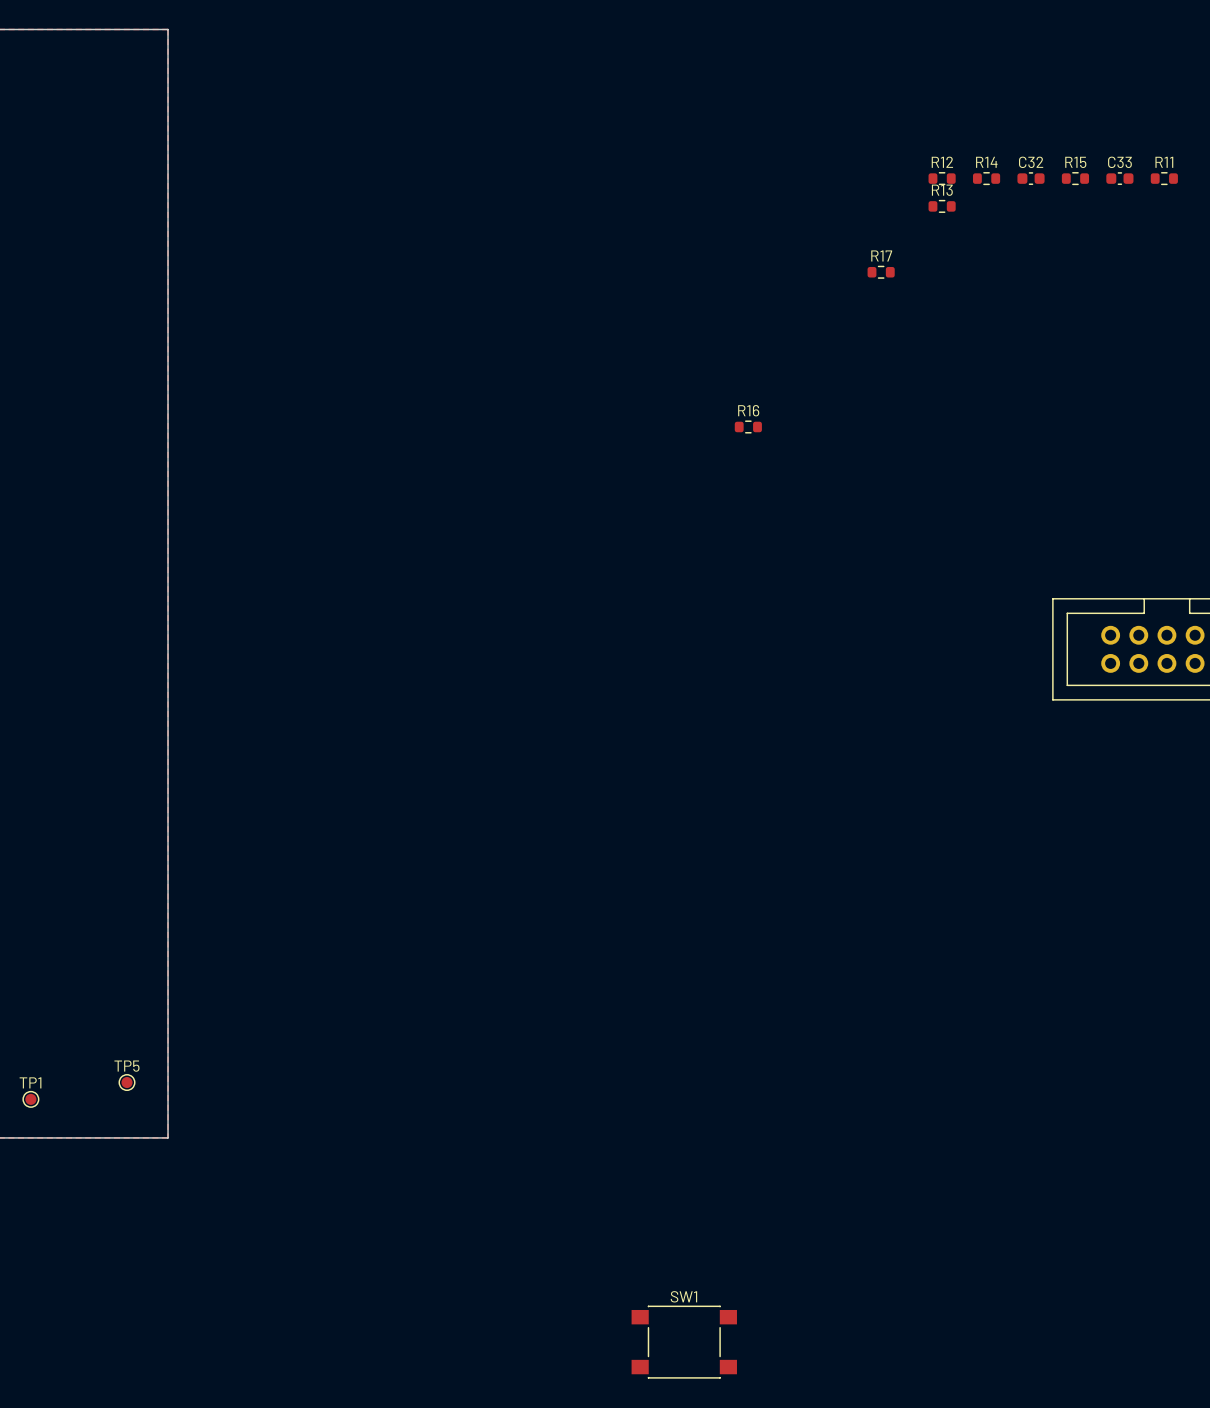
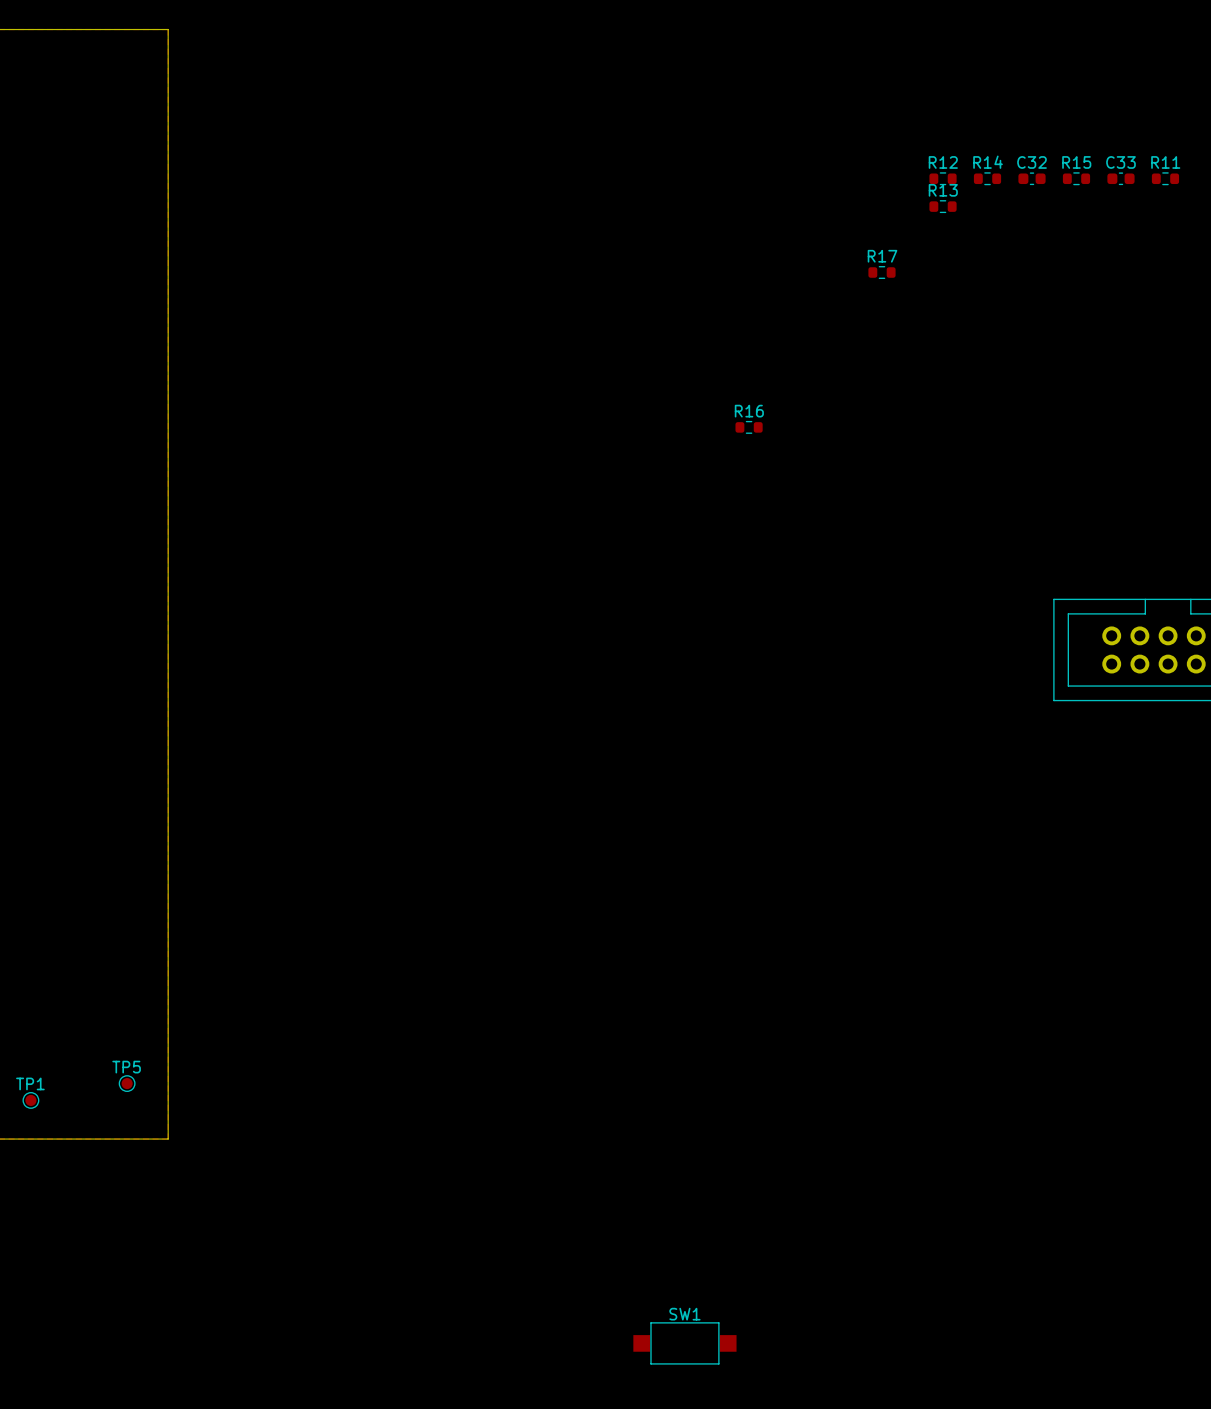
SW1 footprint: [631, 1305, 737, 1379] -> [633, 1322, 737, 1365]

